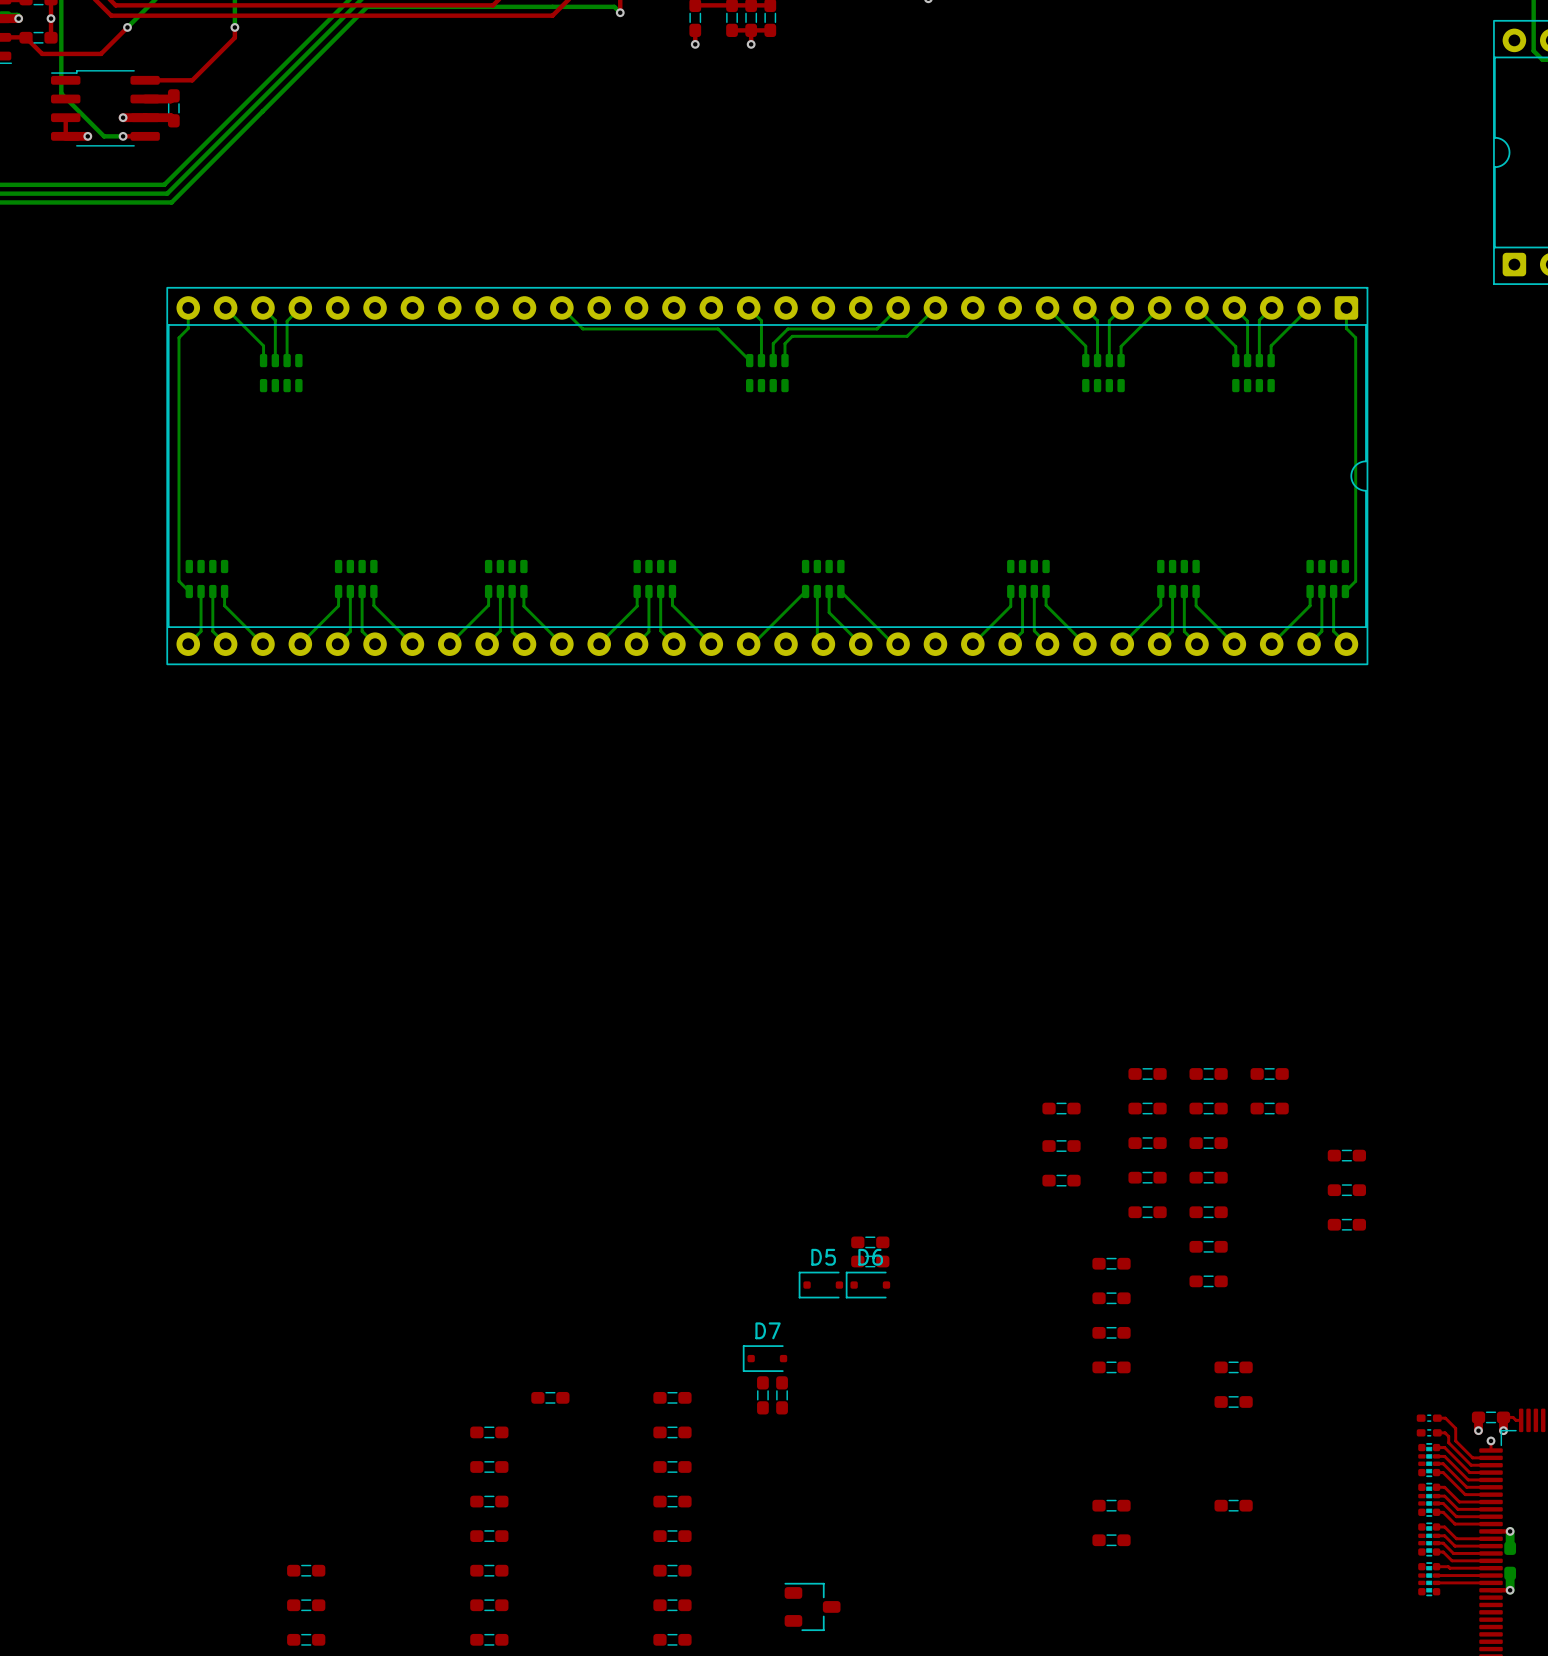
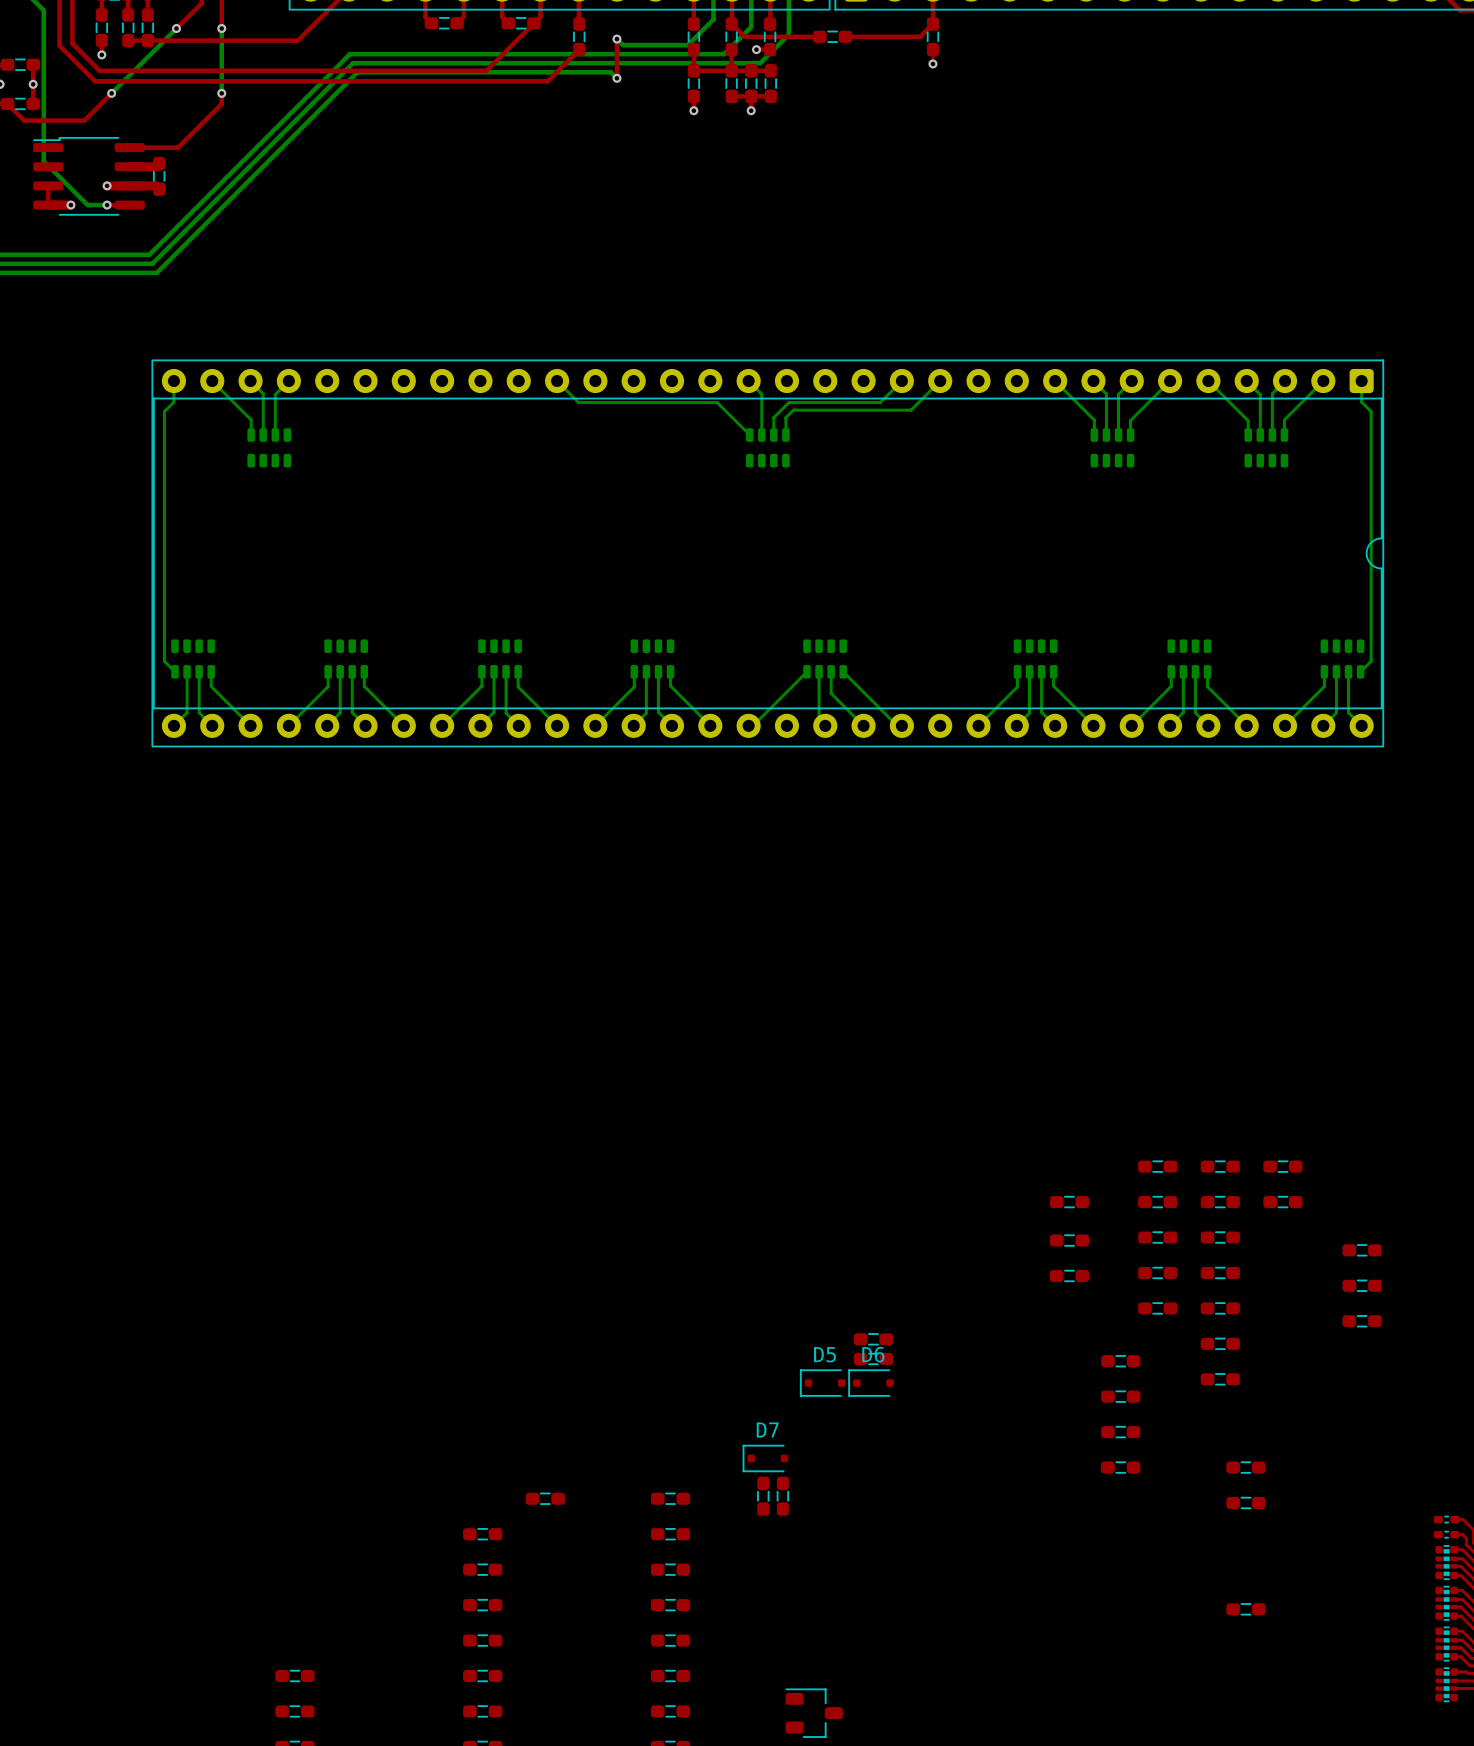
part: (1111, 1505) -> none
part: (1111, 1540) -> none

